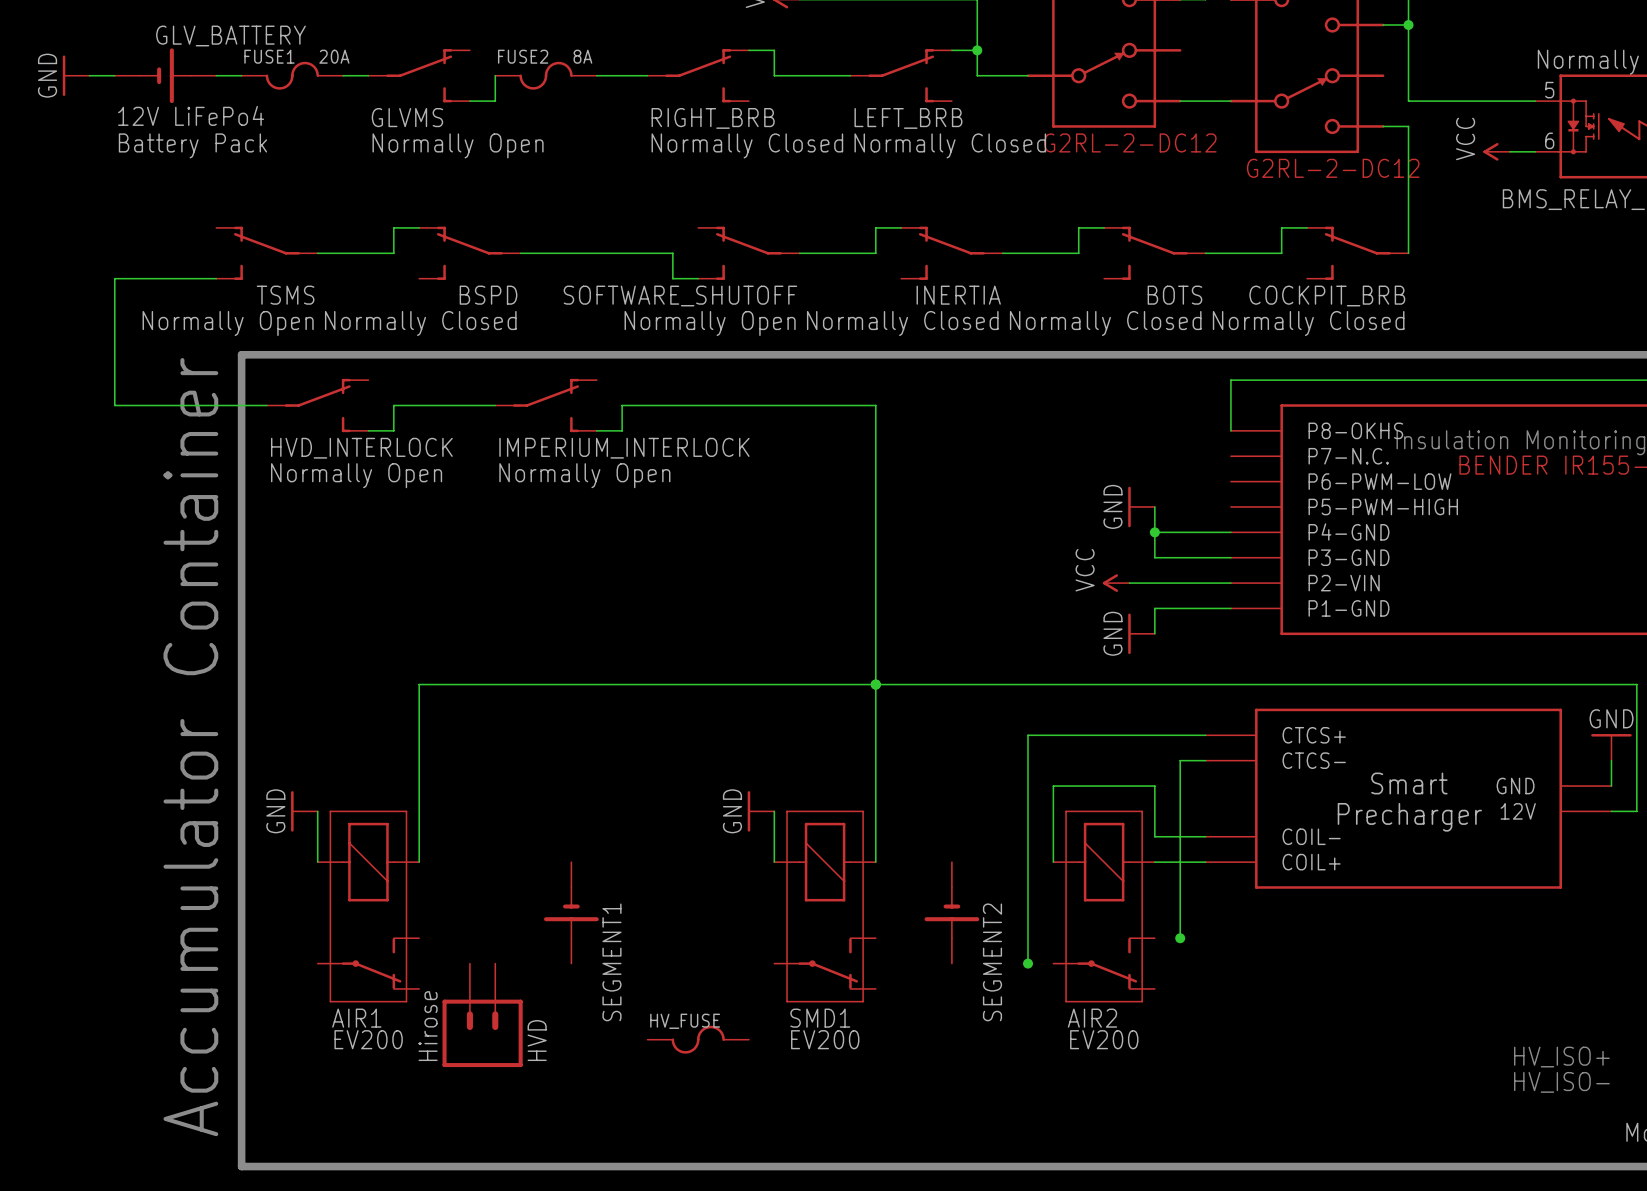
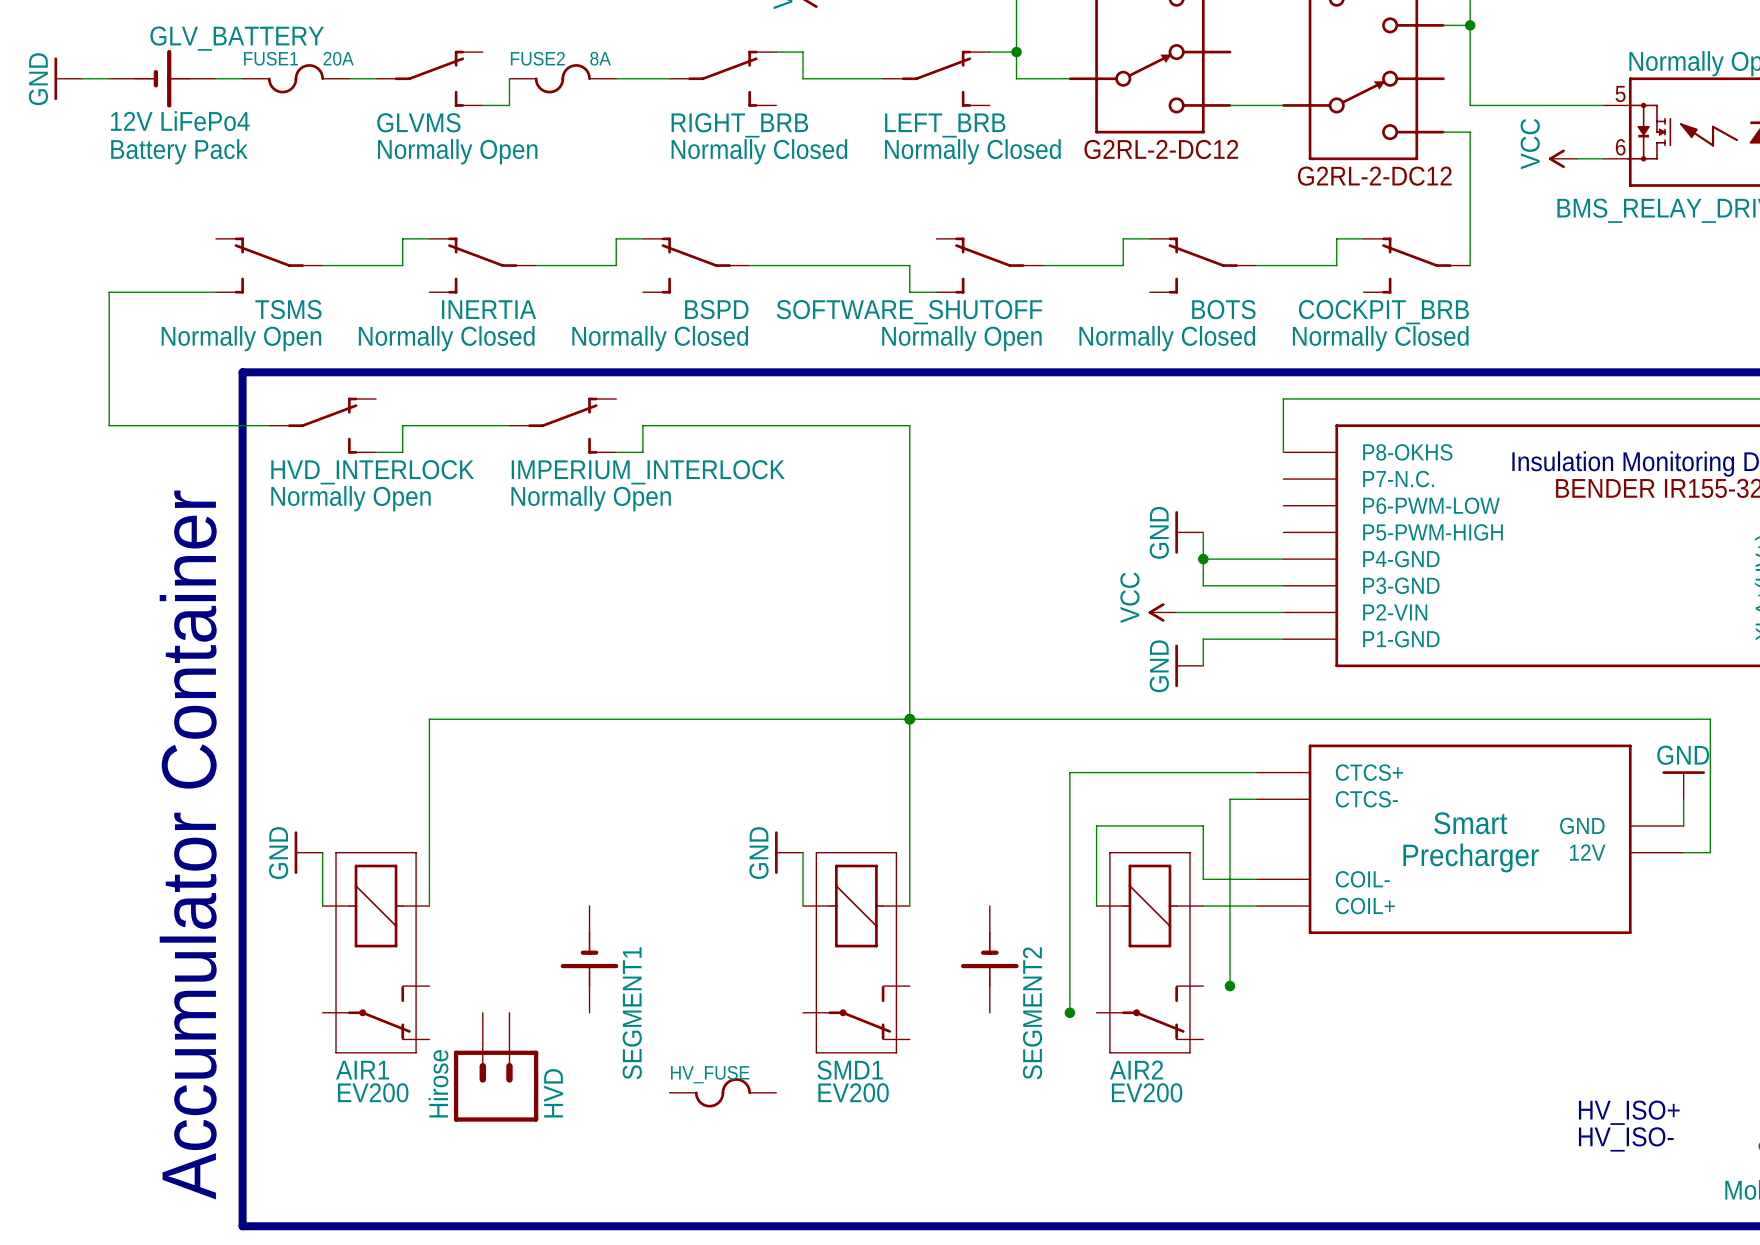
wire: (901, 227) (875, 227) (875, 253) -> (936, 292) (909, 292) (909, 265)
wire: (596, 253) (672, 253) (672, 278) (698, 278) -> (616, 265) (616, 238) (642, 238)
BSPD: none -> Normally Closed (696, 265)
wire: none -> (749, 265) (829, 265)
SOFTWARE_SHUTOFF: Normally Open (748, 253) -> none
BSPD name: BSPD (488, 295) -> INERTIA (489, 309)
INERTIA name: INERTIA (958, 295) -> SOFTWARE_SHUTOFF (909, 312)
INERTIA value: Normally Closed (902, 323) -> Normally Open (961, 338)

